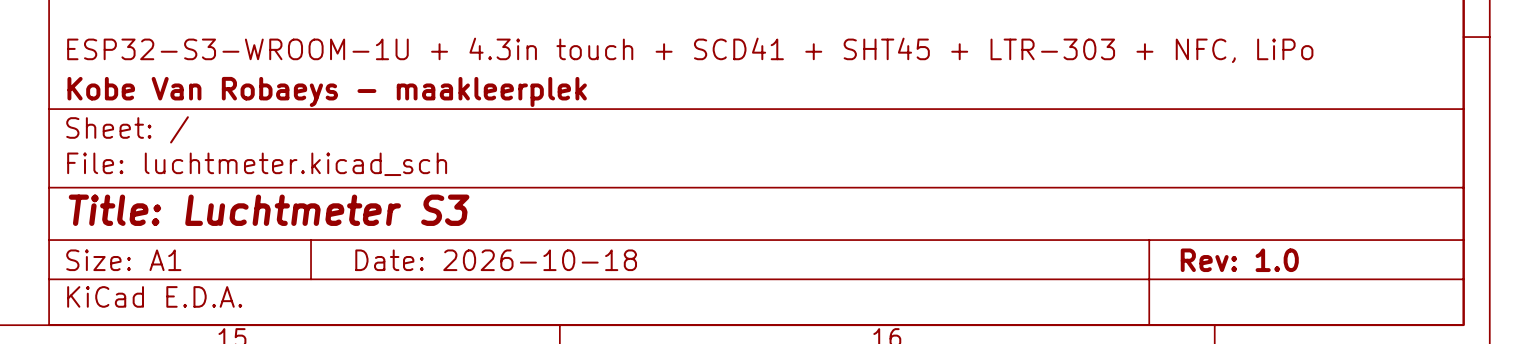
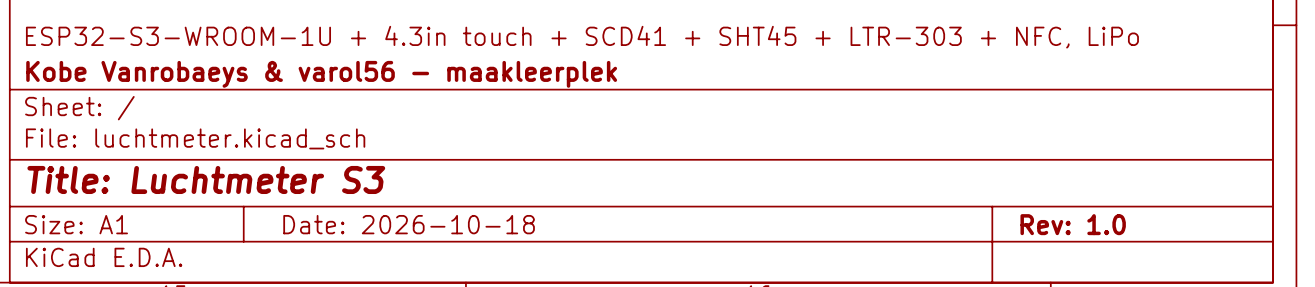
title block: Kobe Van Robaeys - maakleerplek (327, 91) -> Kobe Vanrobaeys & varol56 - maakleerplek (321, 74)

